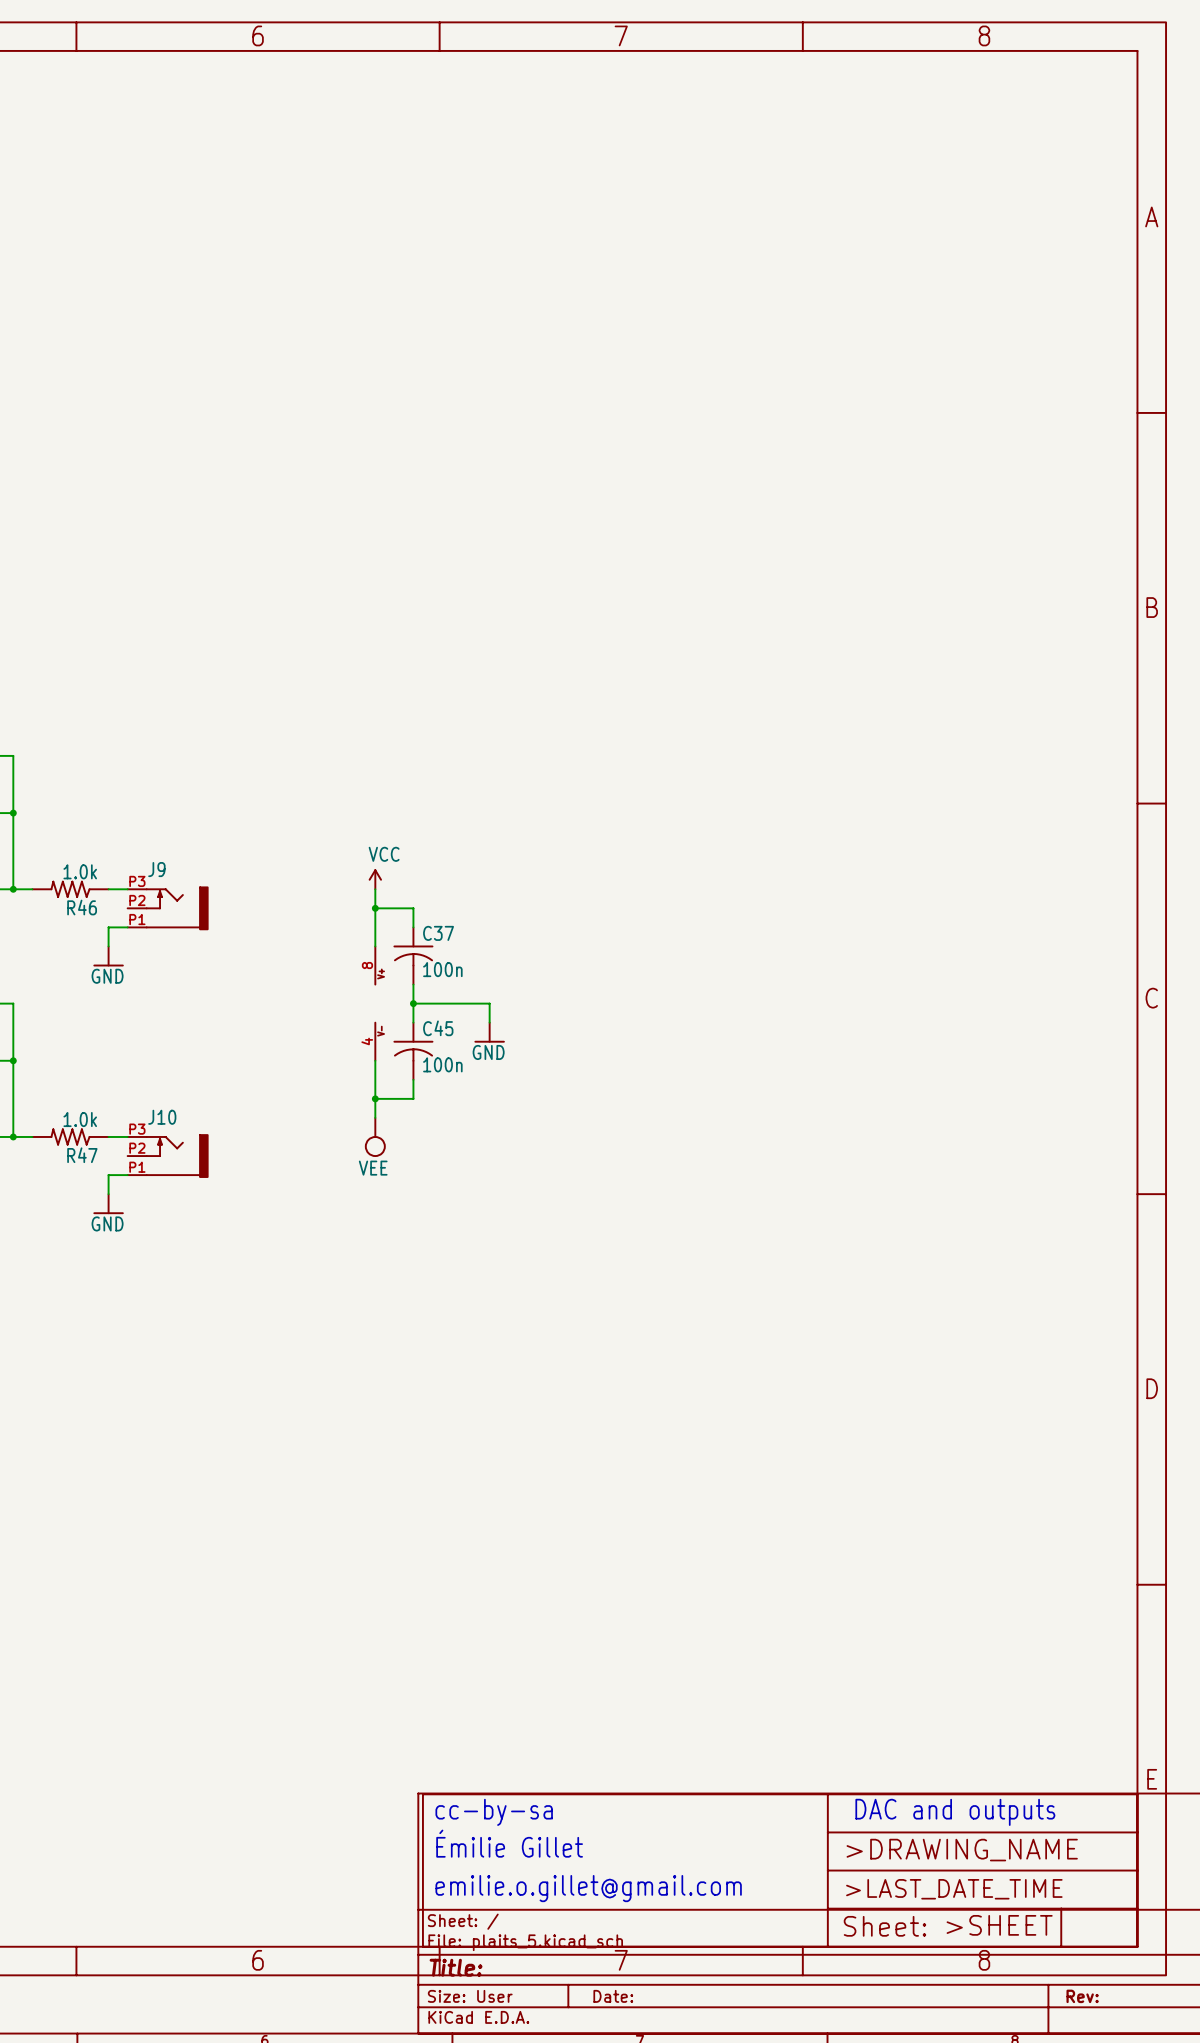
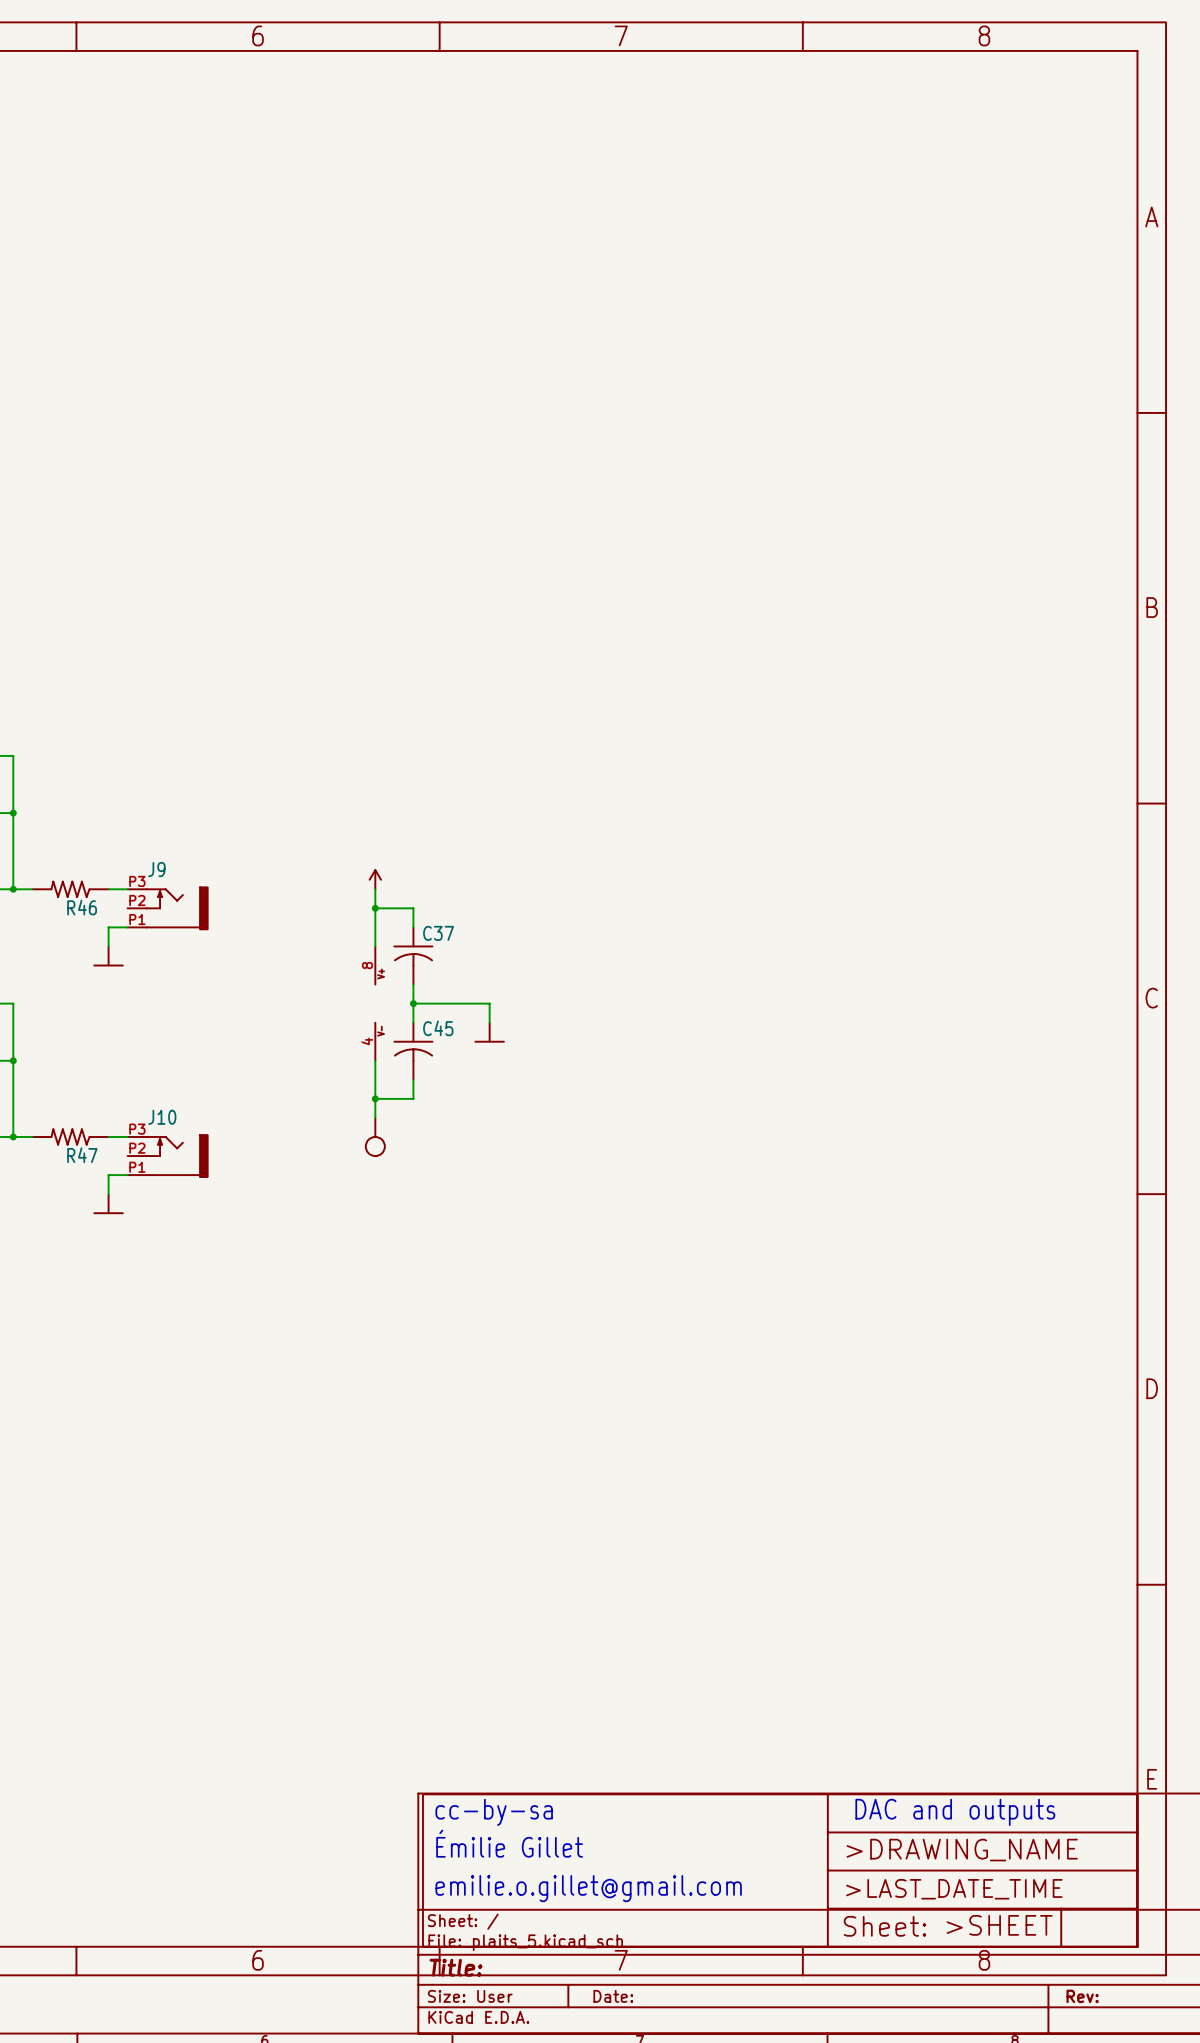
power symbol text: VCC (384, 854) -> none
R46 value: 1.0k (80, 871) -> none
C37 value: 100n (442, 969) -> none
power symbol text: GND (107, 976) -> none
power symbol text: GND (488, 1052) -> none
C45 value: 100n (442, 1064) -> none
R47 value: 1.0k (80, 1119) -> none
power symbol text: VEE (373, 1168) -> none
power symbol text: GND (107, 1223) -> none

